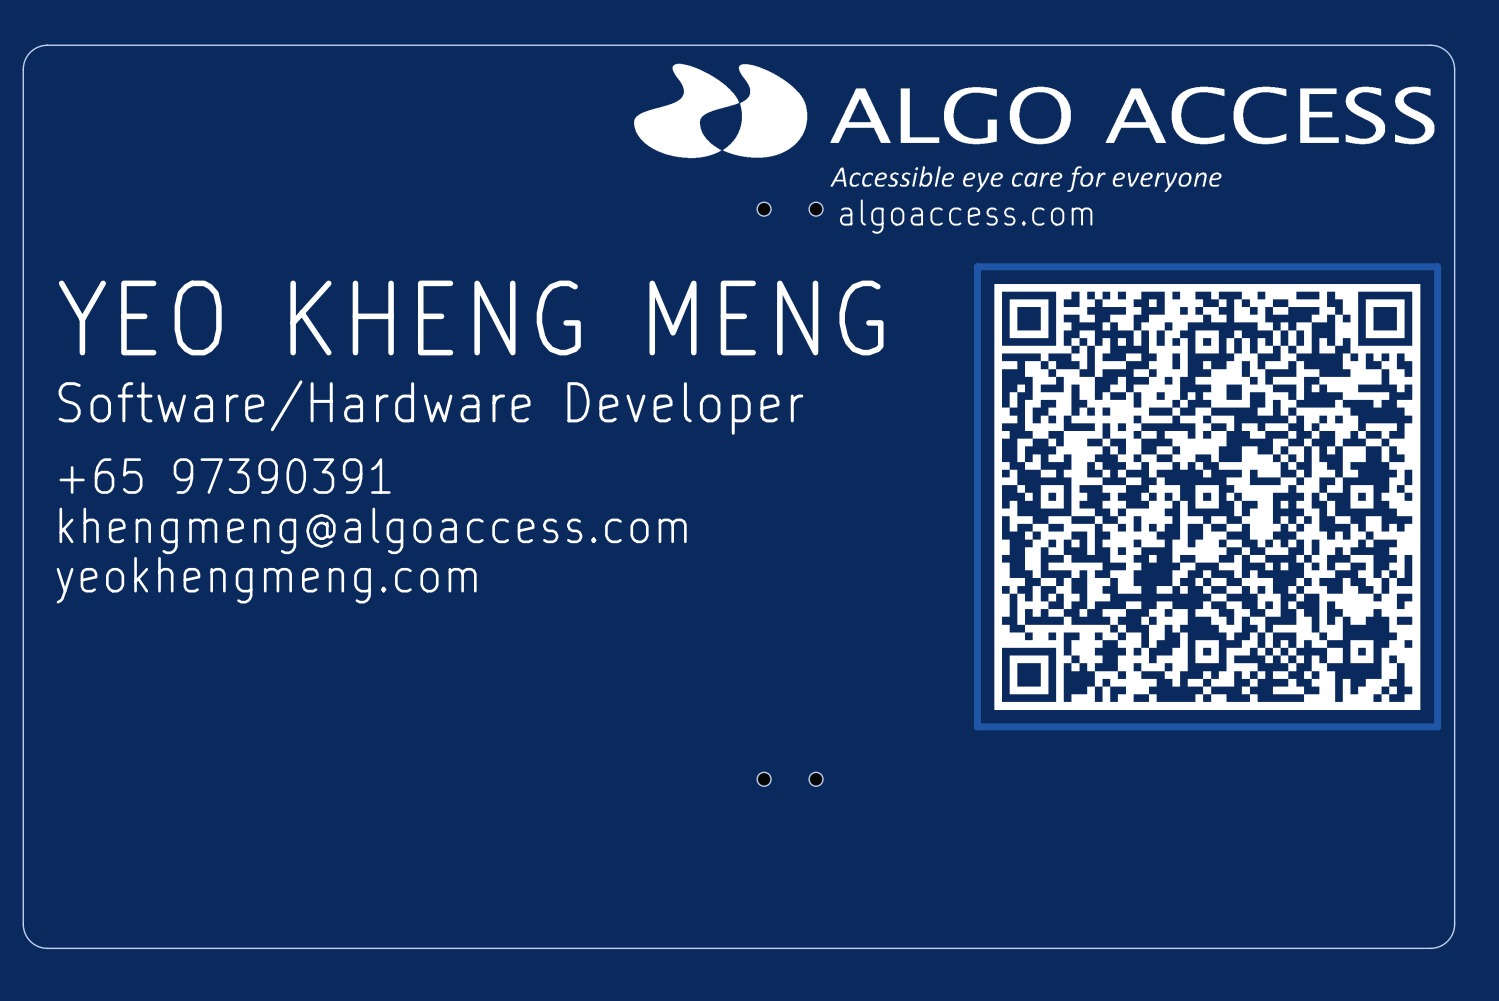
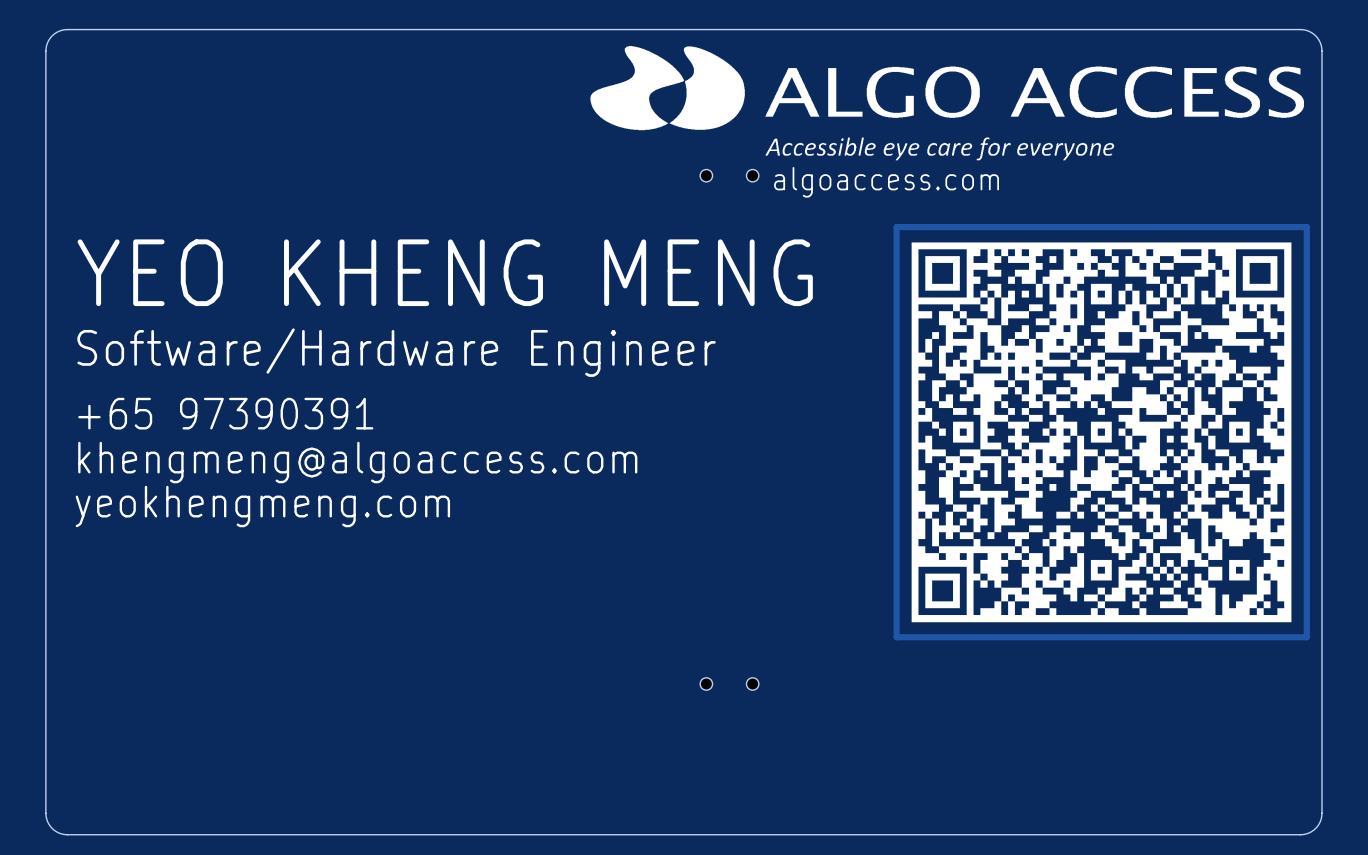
text: Software/Hardware Developer (430, 407) -> Software/Hardware Engineer (396, 352)

